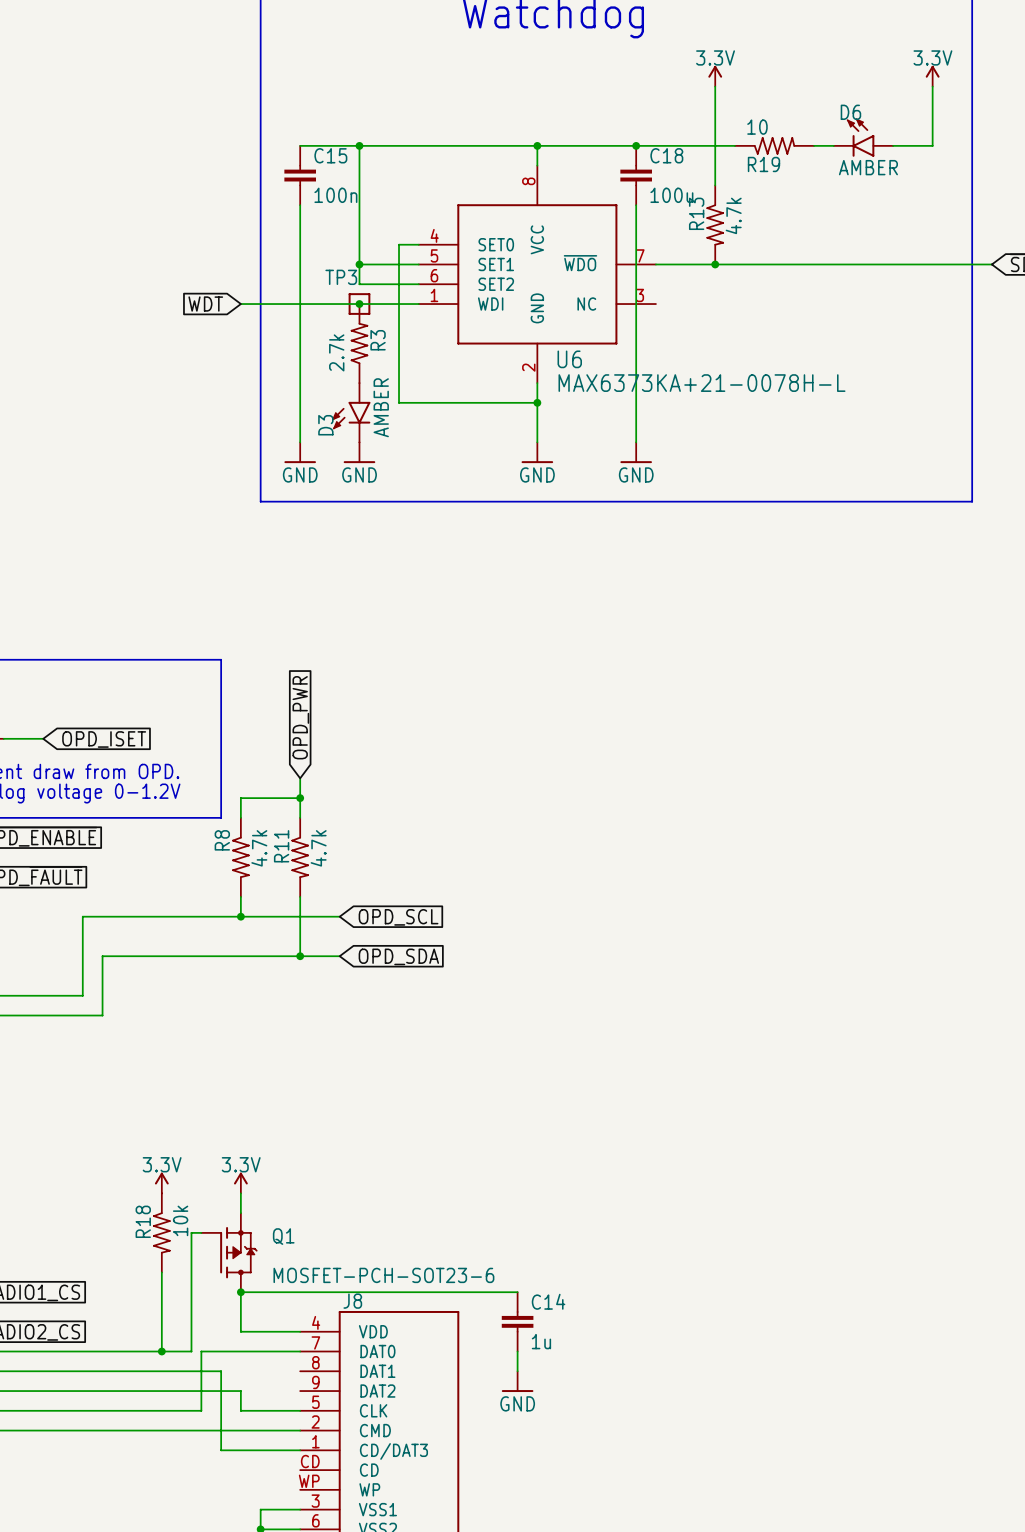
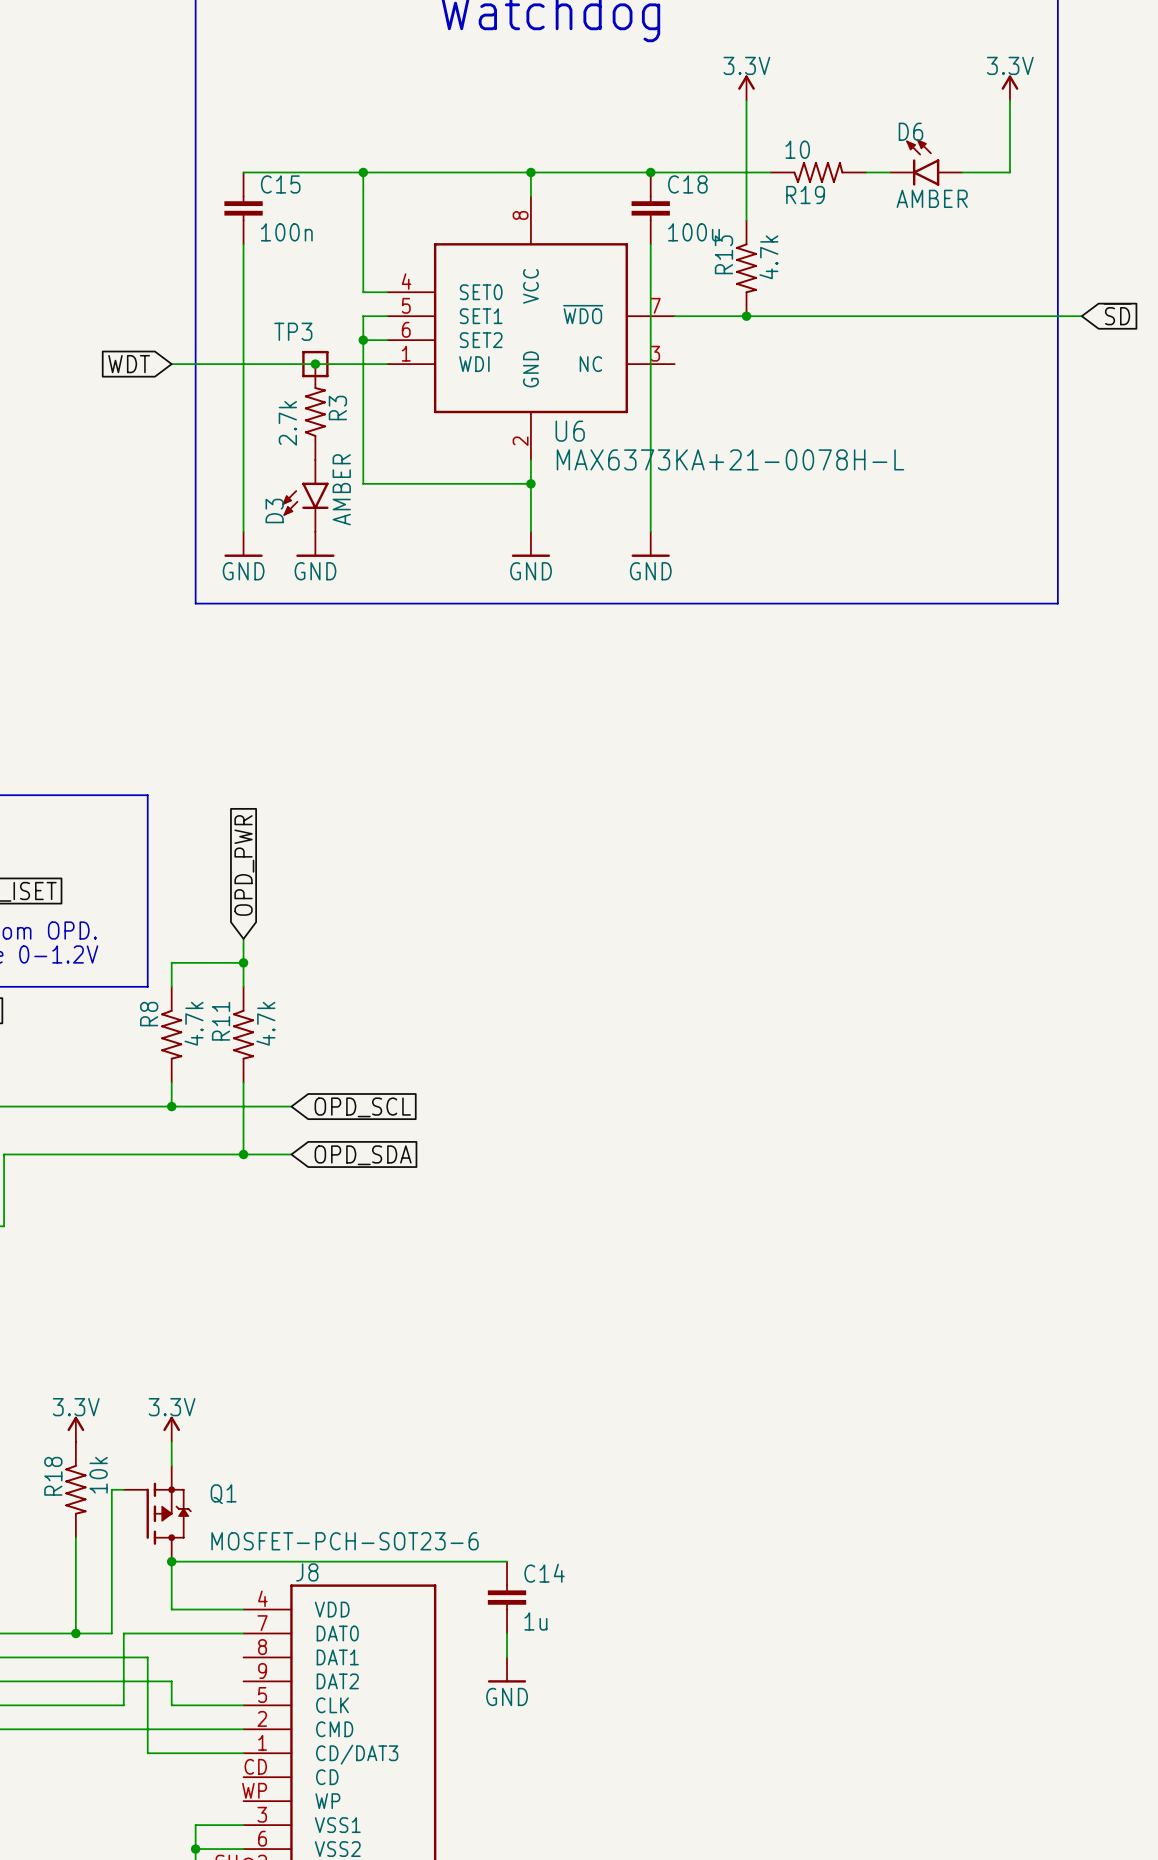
wire: (359, 145) (359, 284) (399, 284) -> none
junction position: (359, 145) -> (363, 172)
wire: (399, 244) (399, 264) (359, 264) -> (363, 292) (363, 172)
junction position: (359, 264) -> (363, 340)

